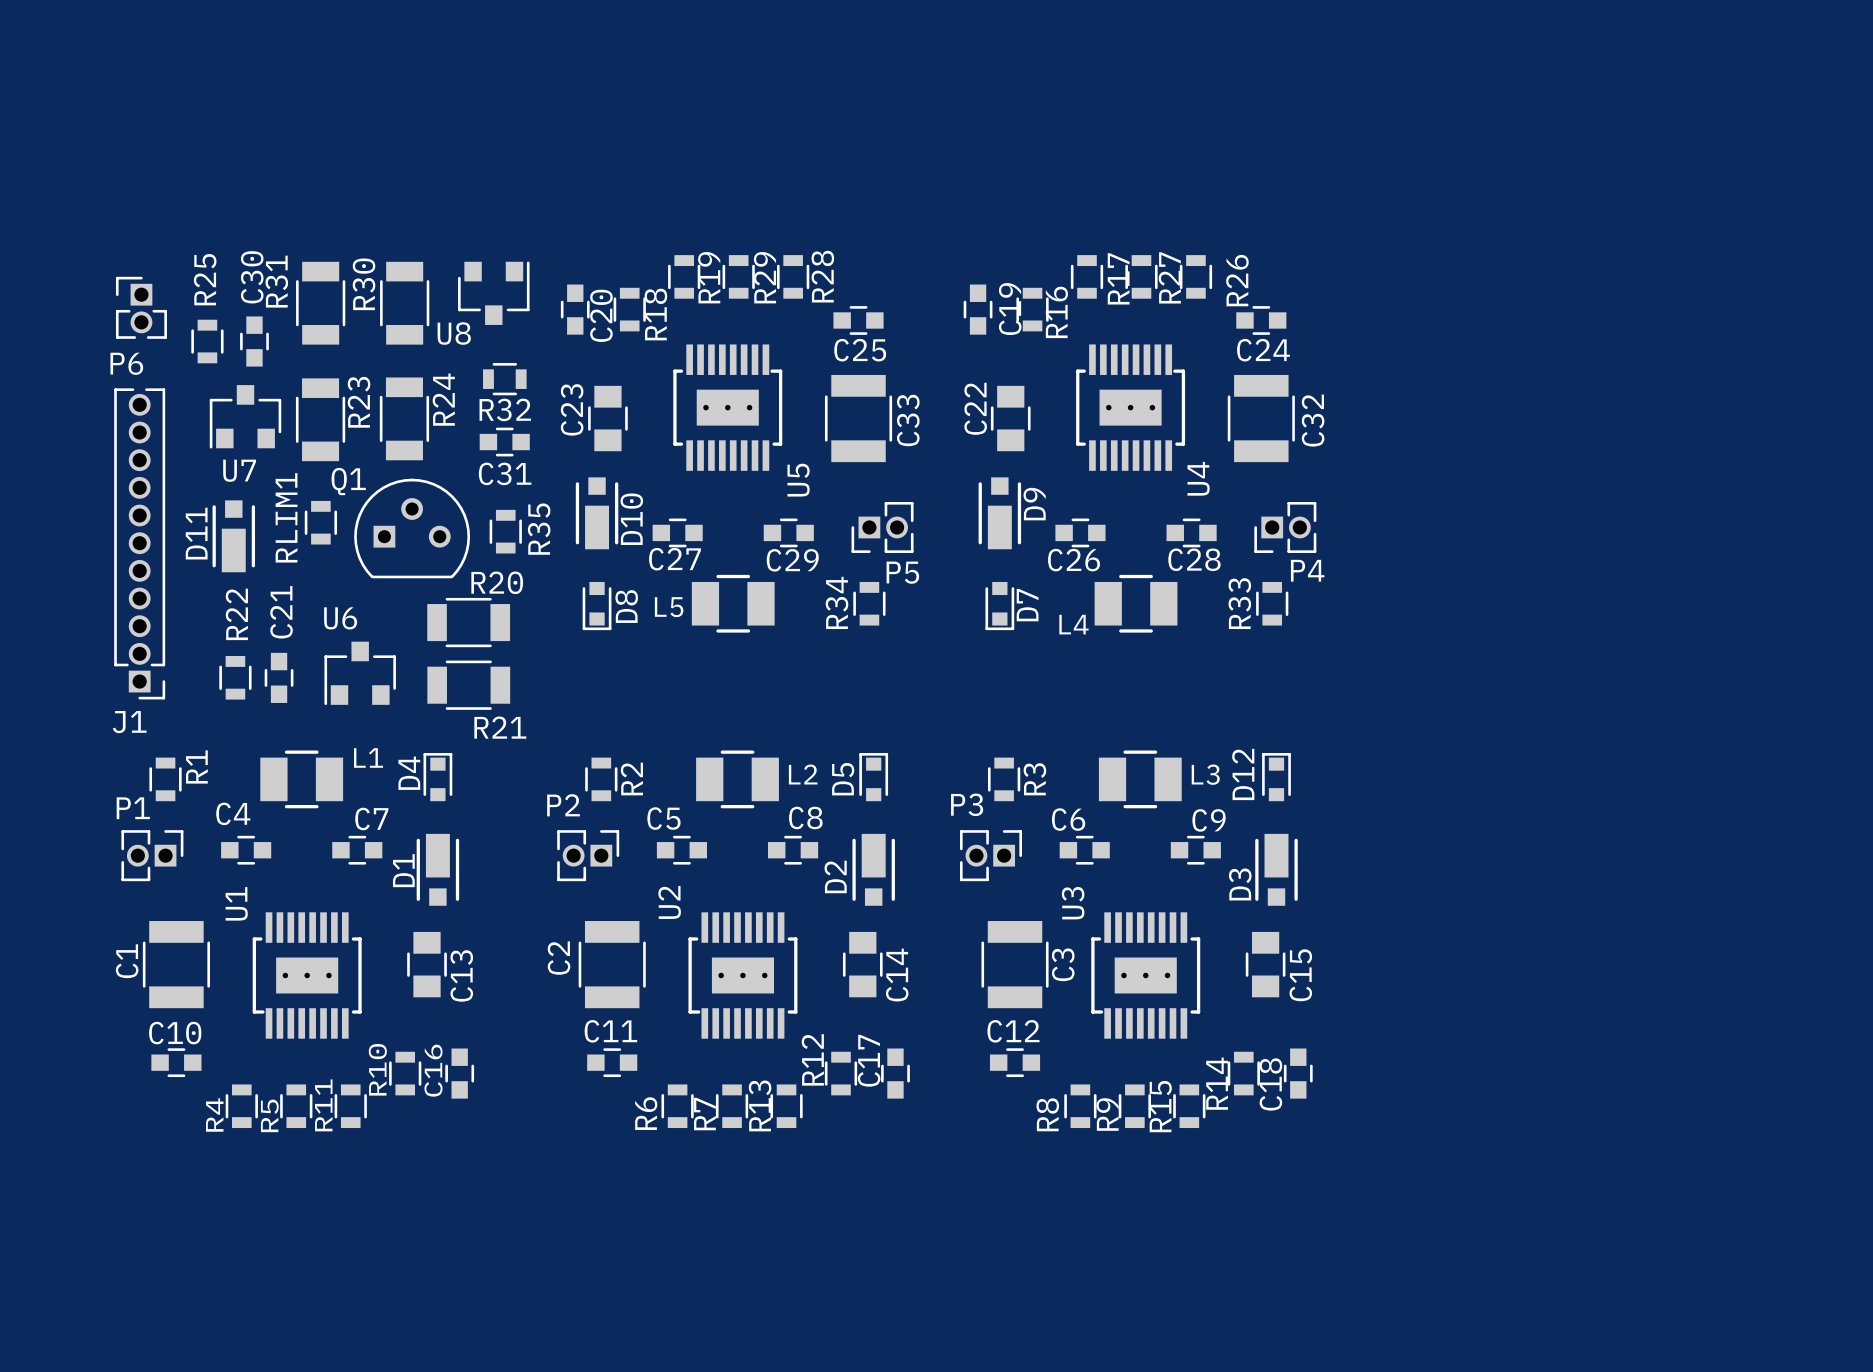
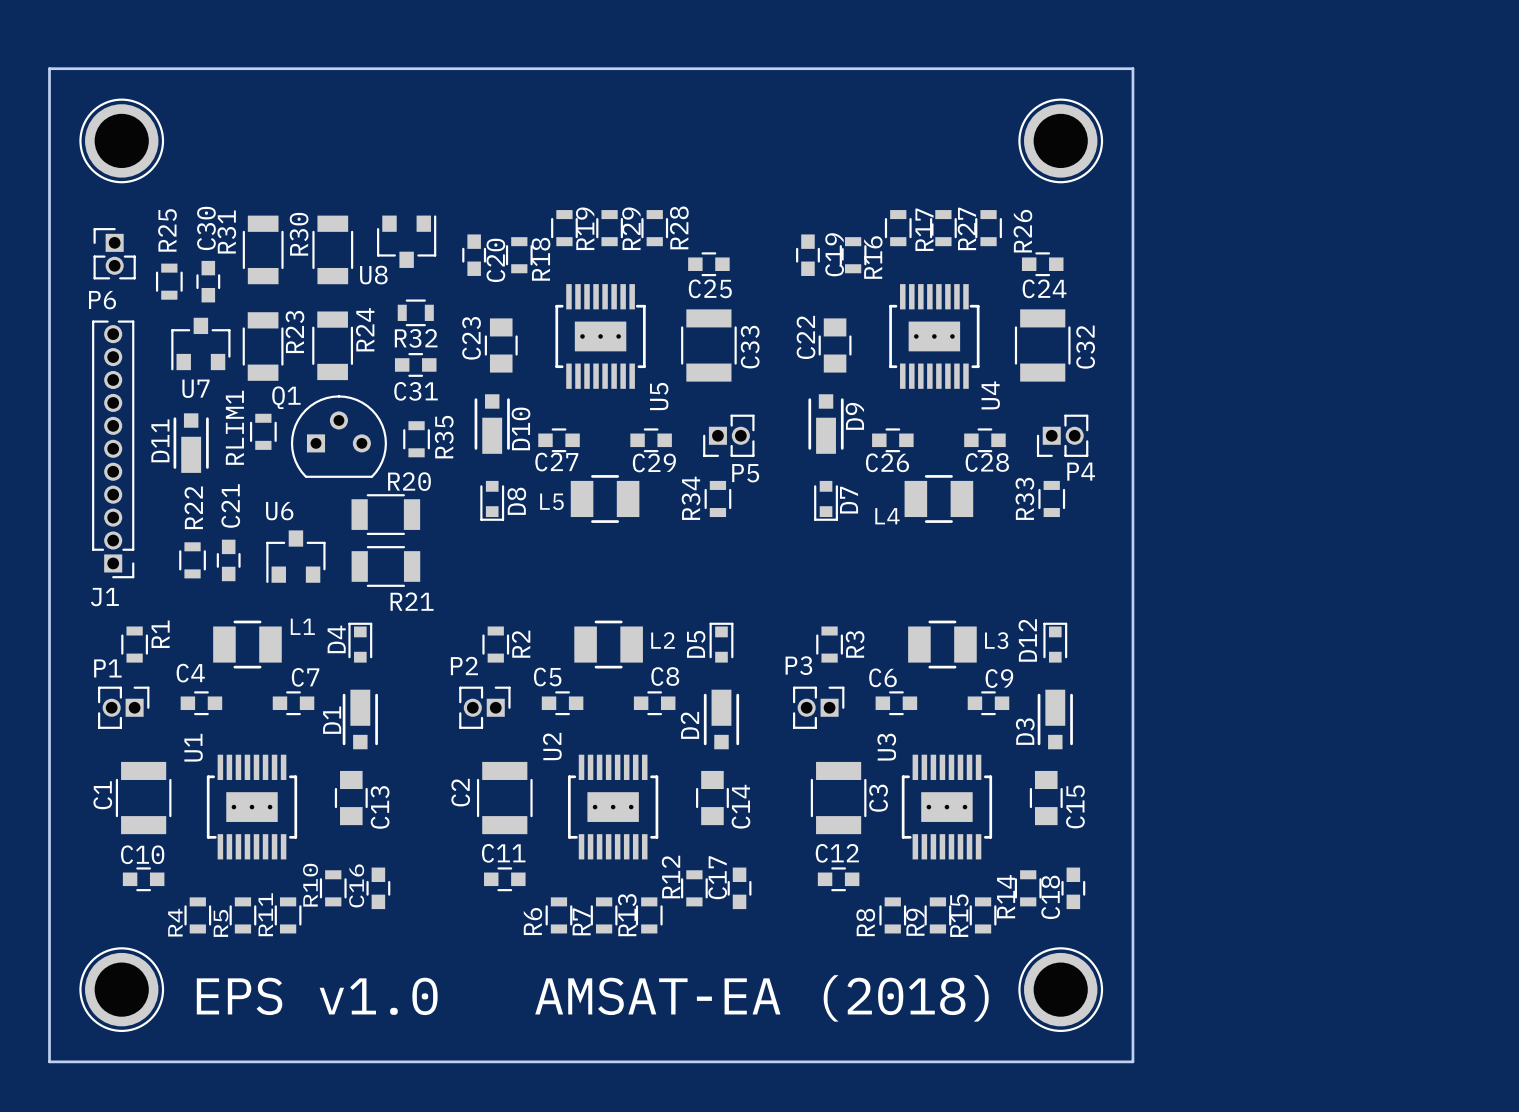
board edge: none -> (49, 68) (49, 1061) (1132, 1061) (1132, 68) (49, 68)
part: none -> (121, 140)
part: none -> (1060, 140)
part: none -> (121, 989)
part: none -> (1060, 989)
text: none -> EPS v1.0 AMSAT-EA (2018) (592, 998)

